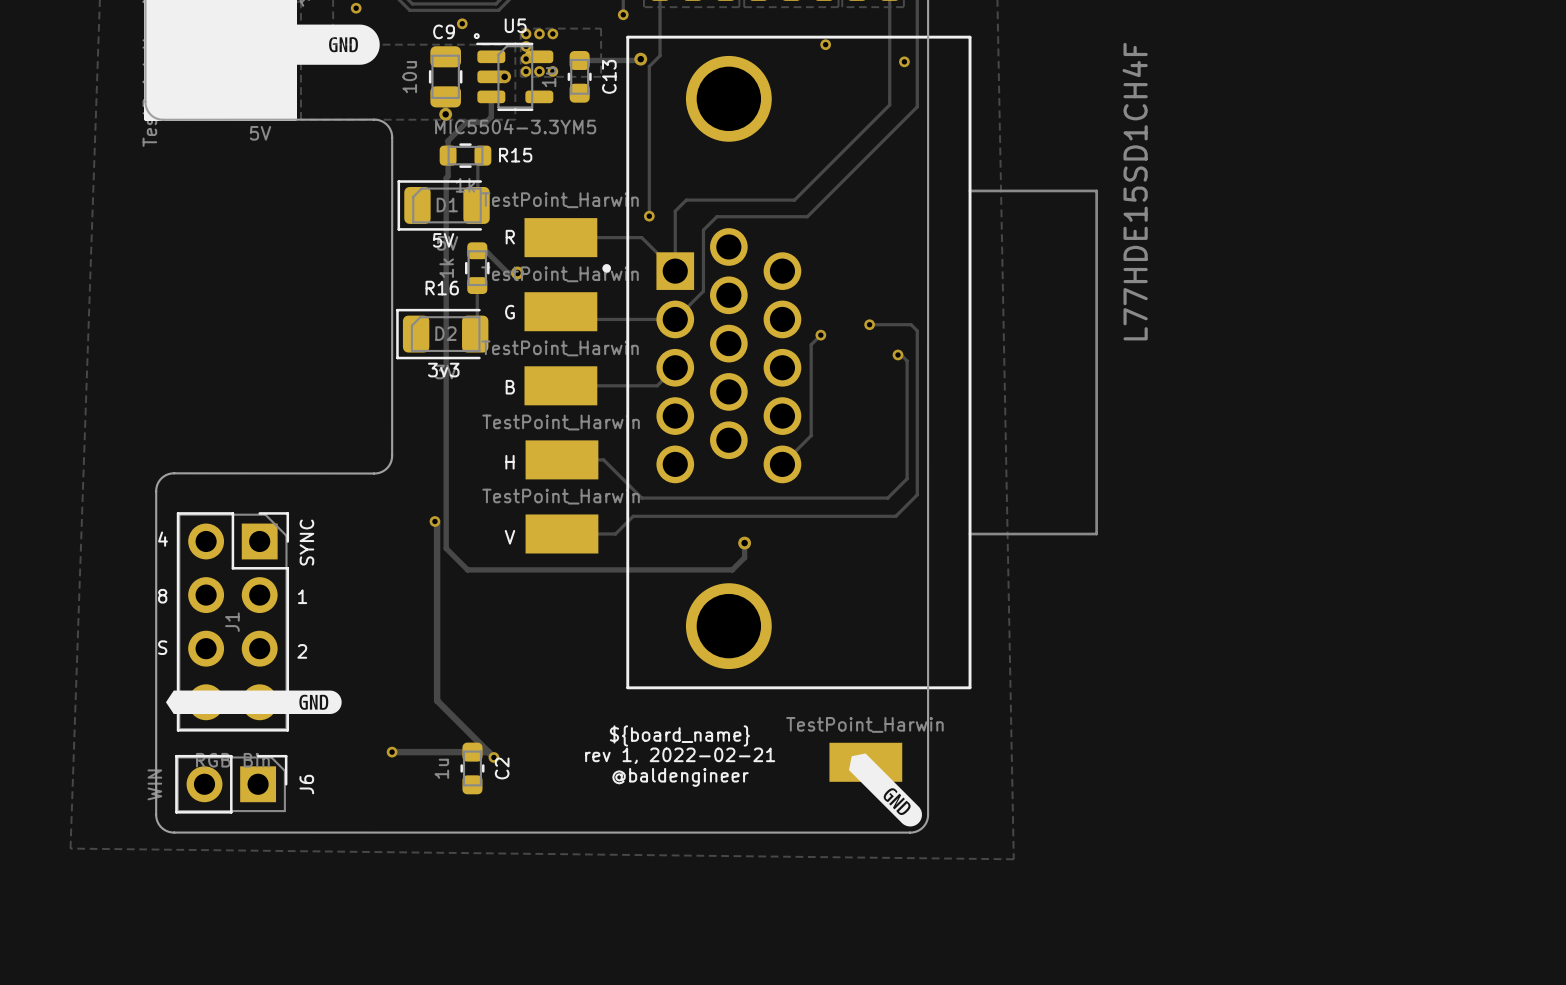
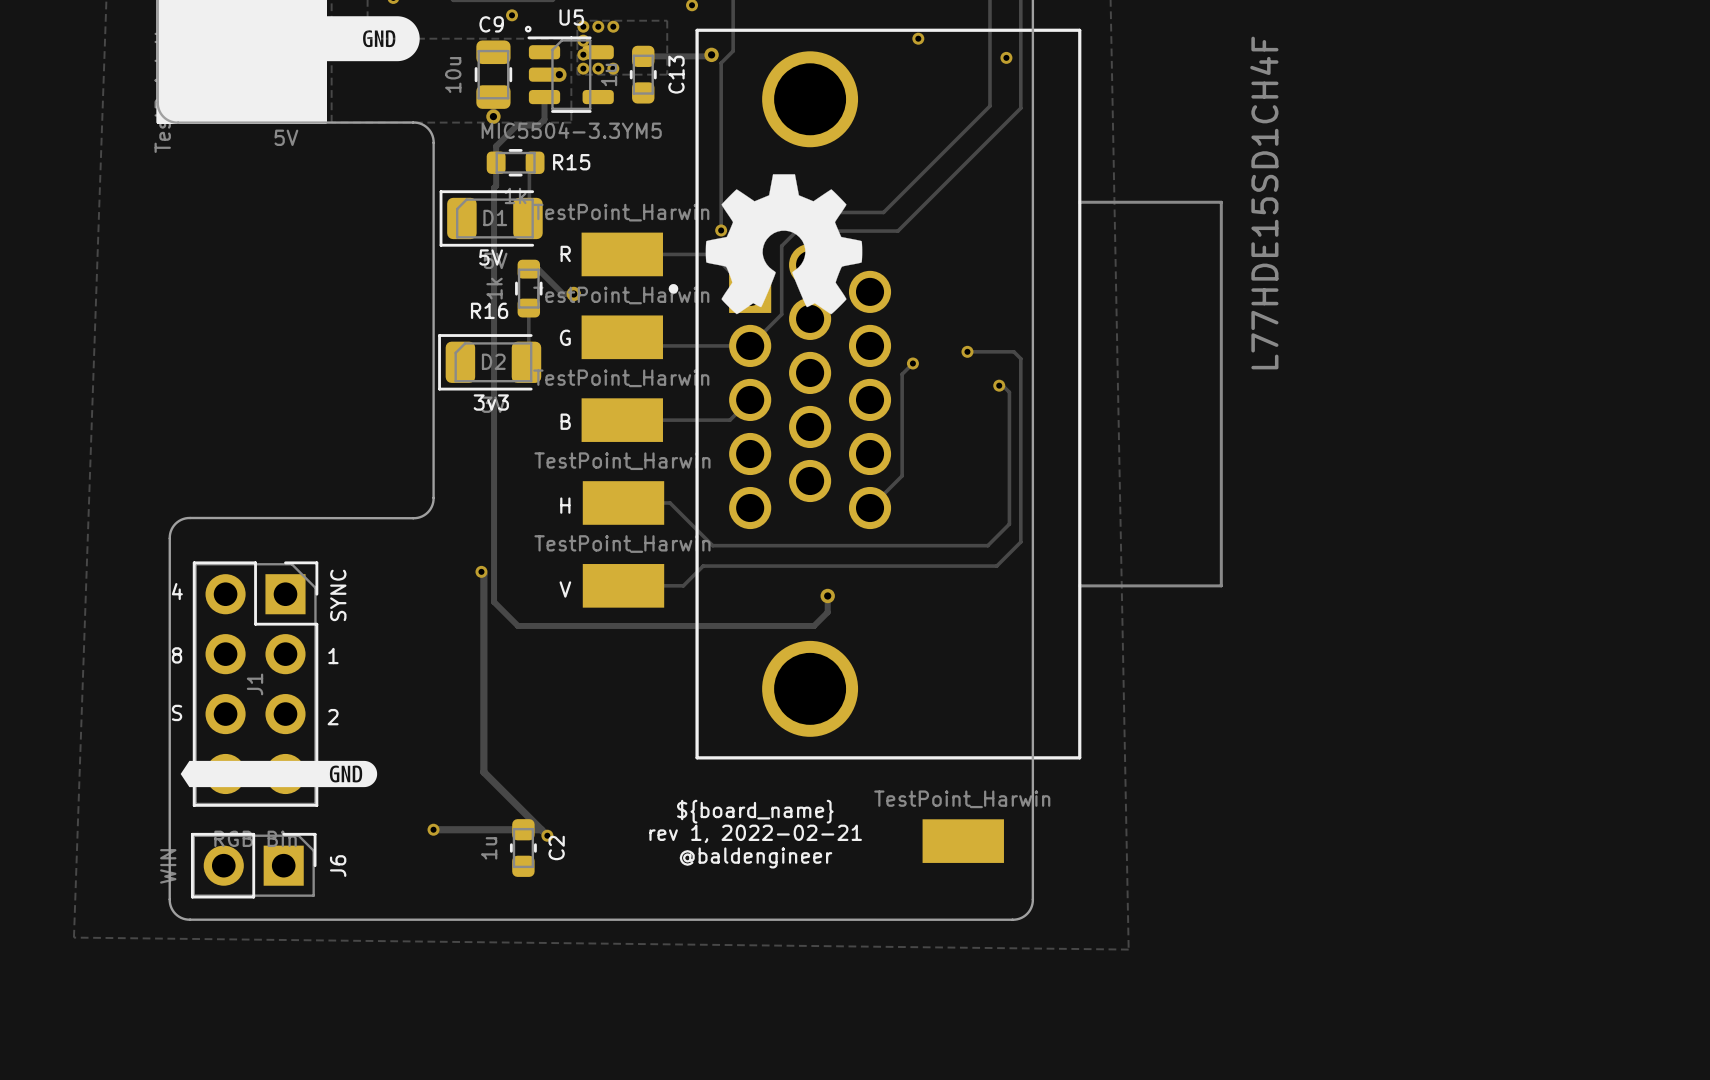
drawing: none -> [705, 174, 863, 315]
drawing: [848, 753, 922, 827] -> none

